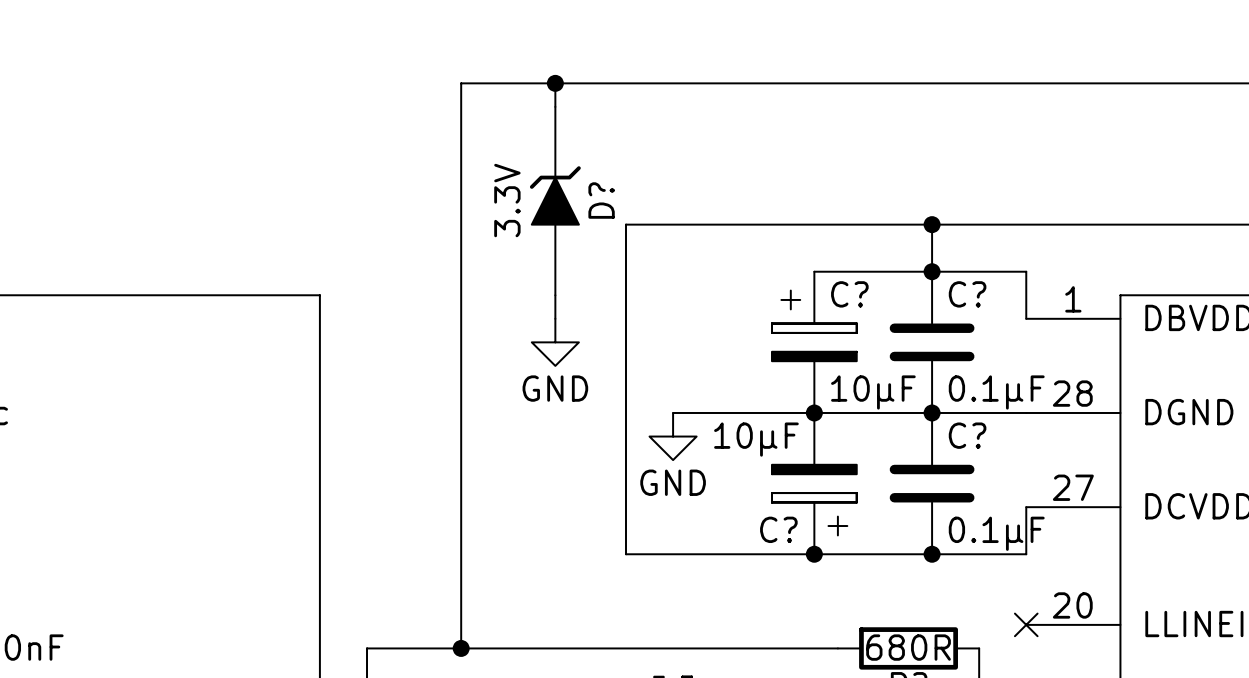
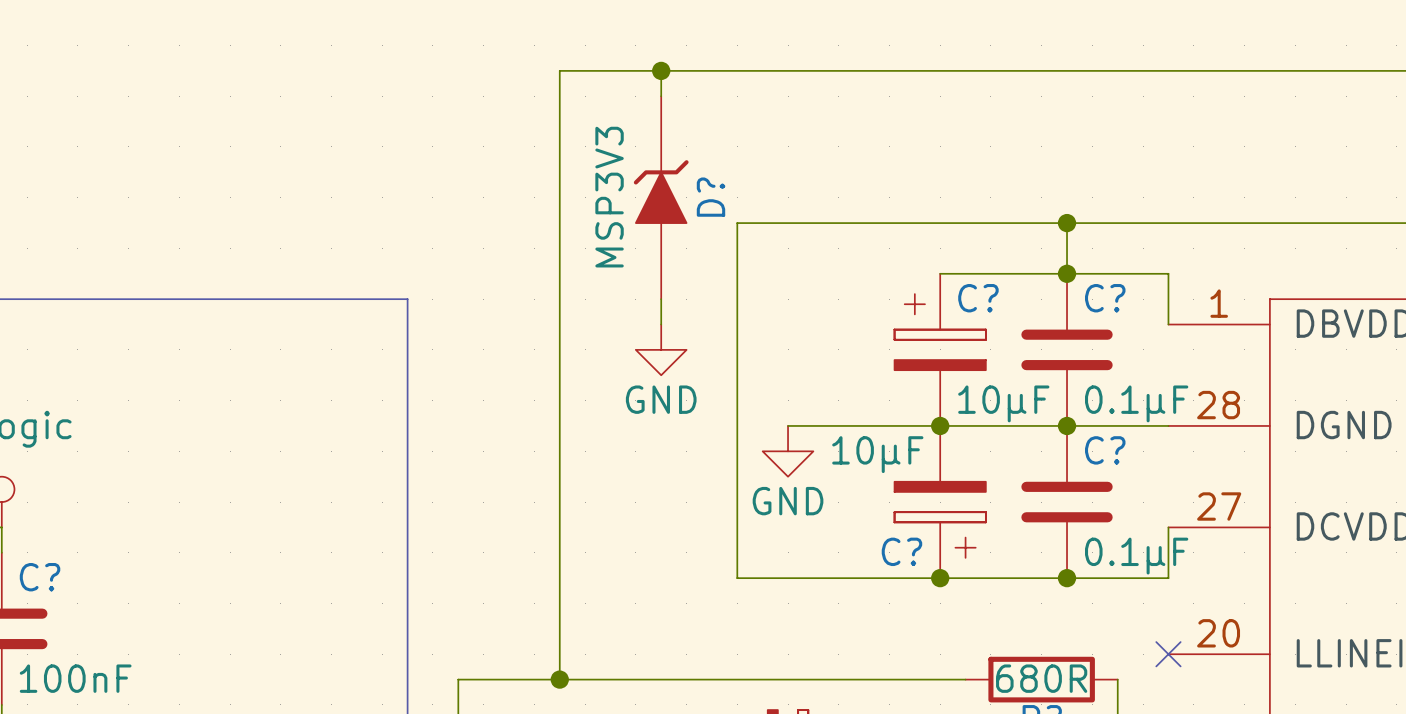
D? value: 3.3V (507, 200) -> MSP3V3 (609, 197)

